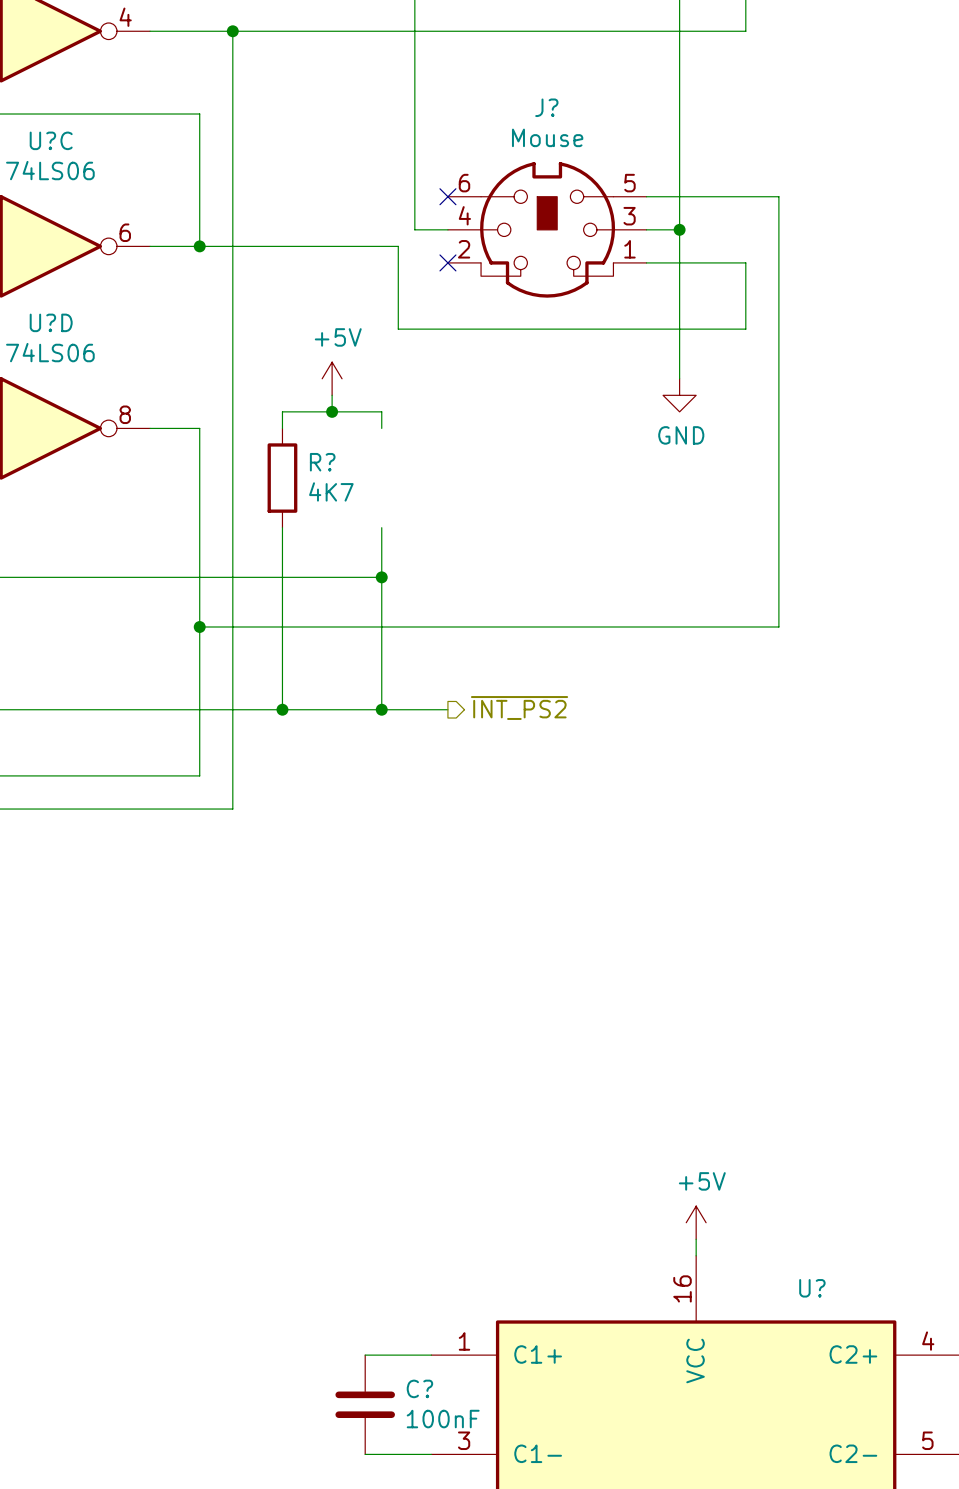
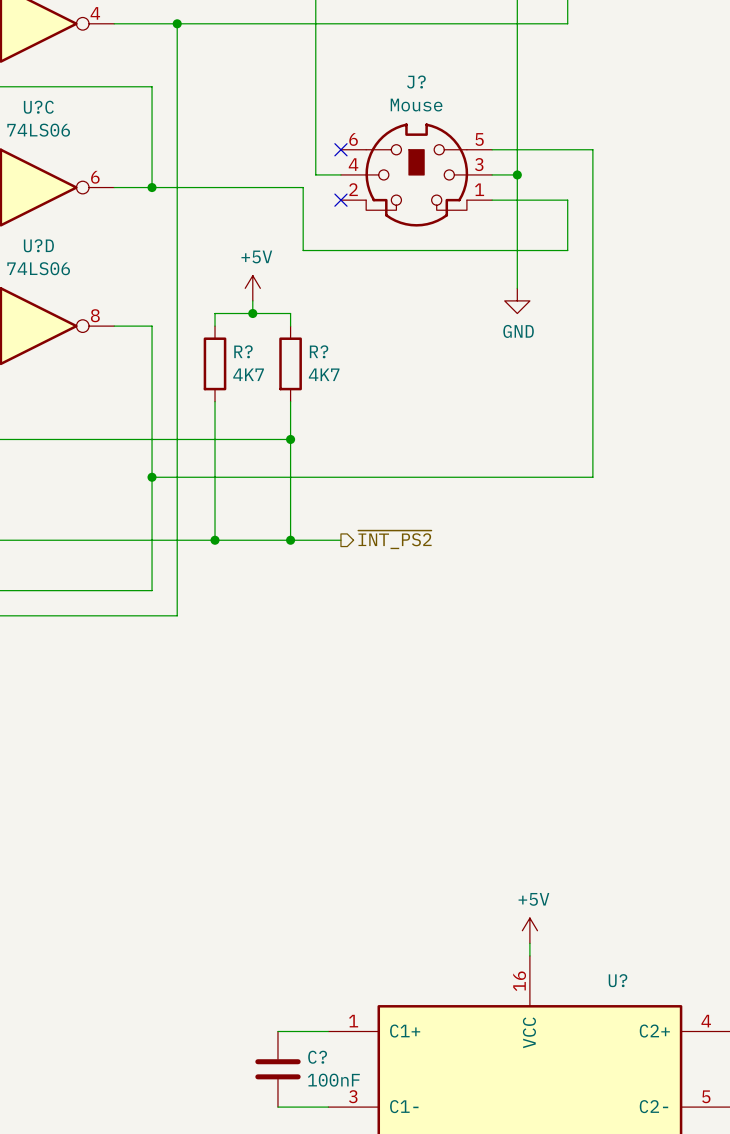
R?: none -> 4K7 (290, 363)

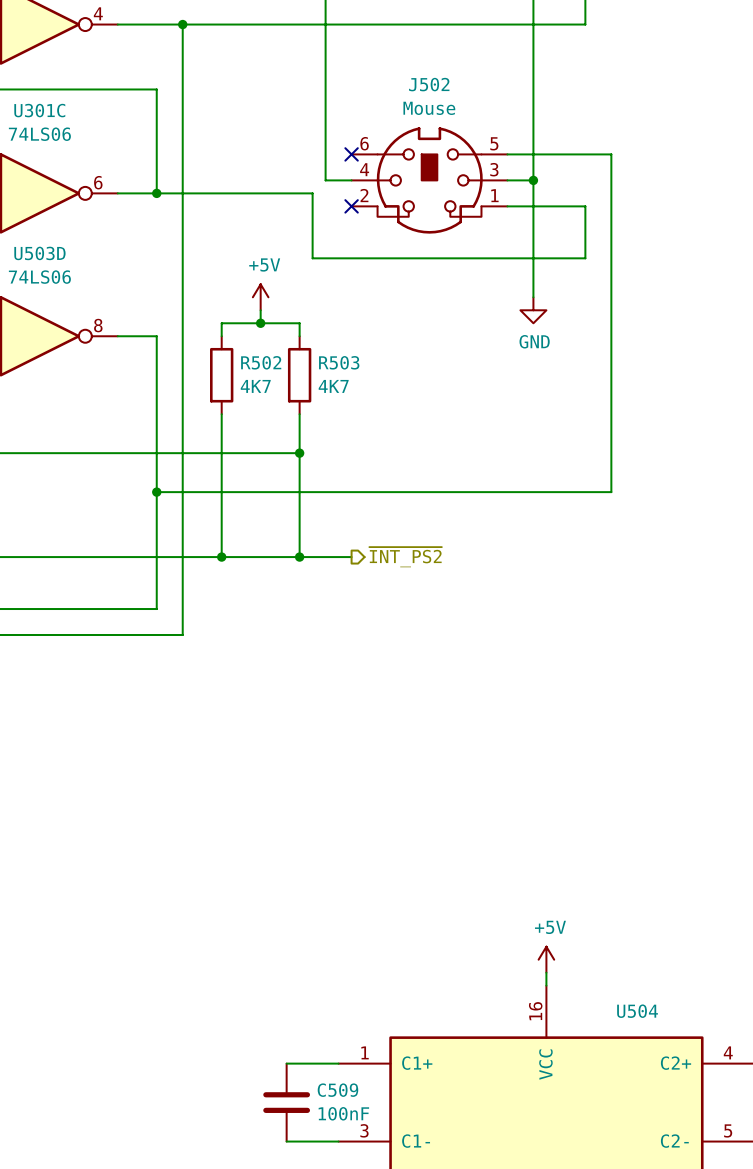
J? name: J? (416, 82) -> J502 (429, 84)
U?C name: U?C (38, 107) -> U301C (39, 110)
U?D name: U?D (38, 245) -> U503D (39, 253)
R? name: R? (243, 351) -> R502 (261, 362)
R? name: R? (319, 351) -> R503 (339, 362)
U? name: U? (618, 980) -> U504 (637, 1011)
C? name: C? (317, 1057) -> C509 (337, 1090)

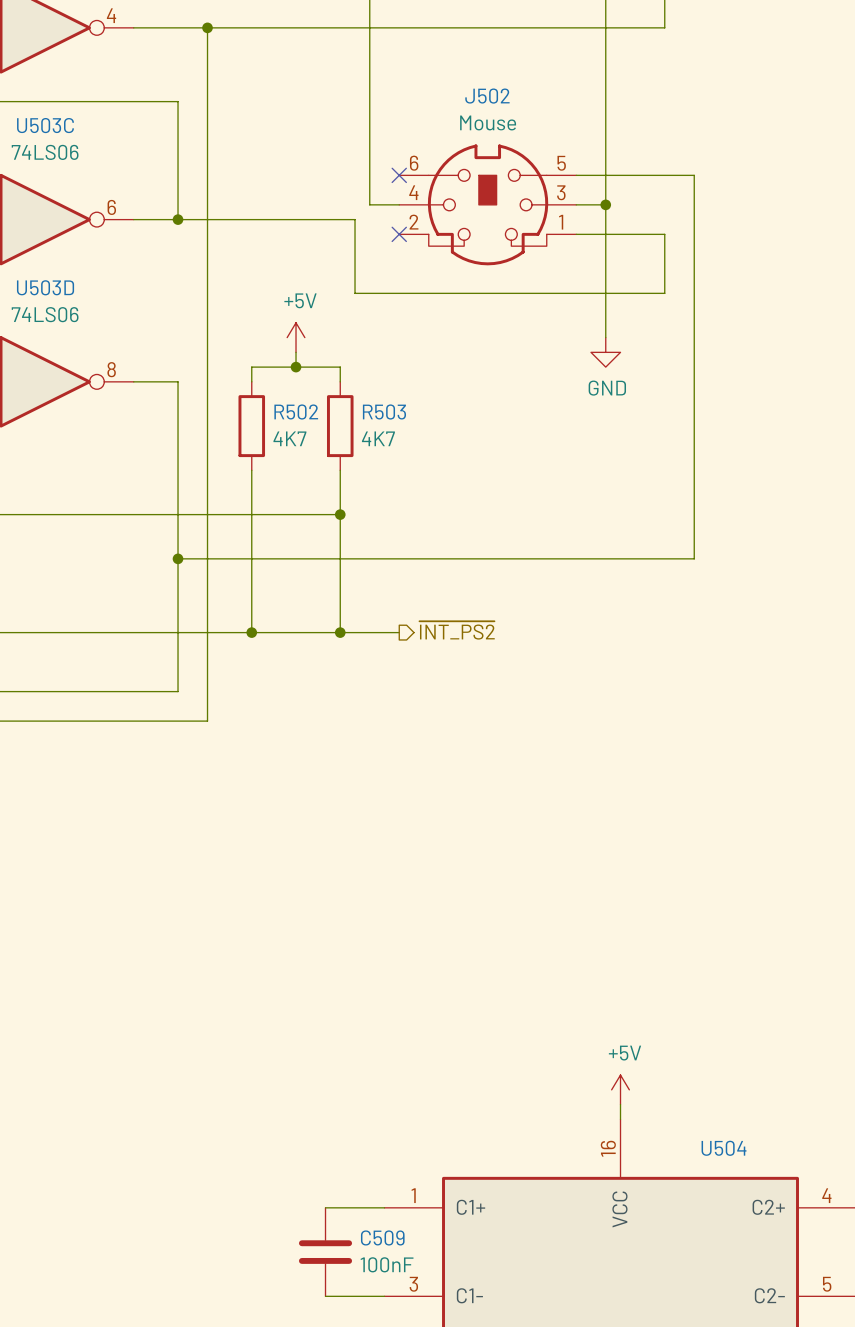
U301C name: U301C (39, 110) -> U503C (45, 125)

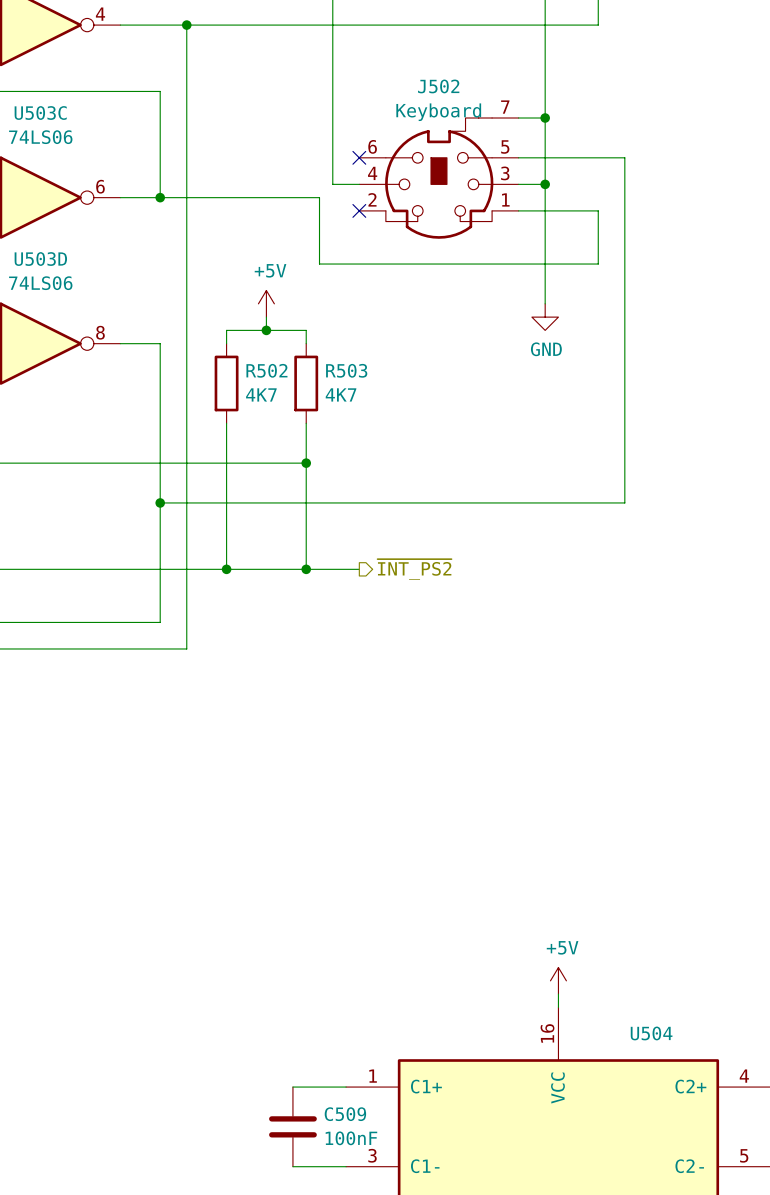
J502 value: Mouse (488, 122) -> Keyboard (438, 112)
wire: none -> (518, 118) (545, 118)
junction: none -> (545, 118)
J502 symbol: [399, 144, 577, 266] -> [359, 118, 519, 239]

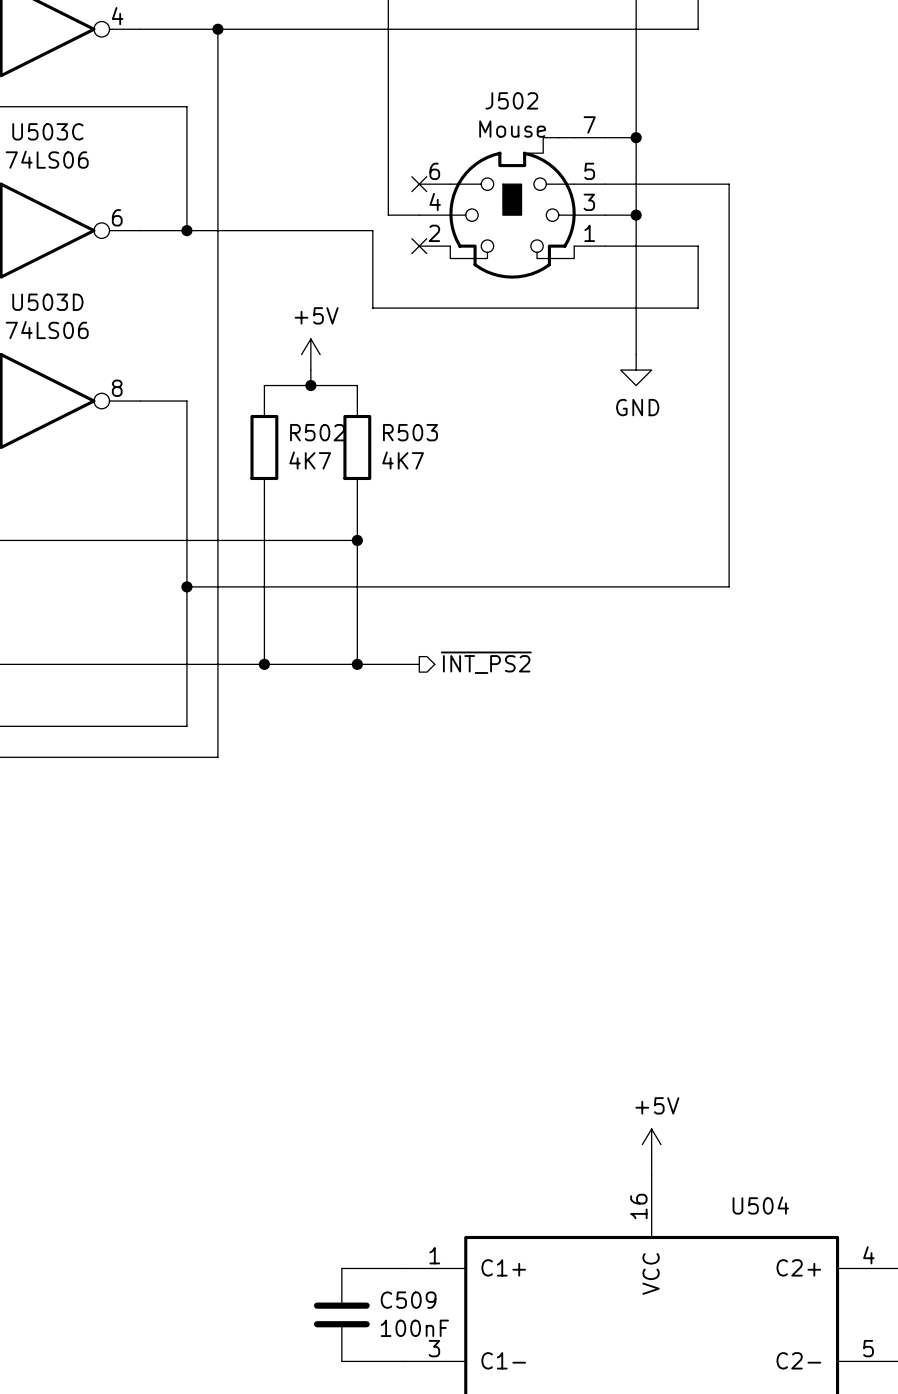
J502 value: Keyboard (438, 112) -> Mouse (512, 129)

